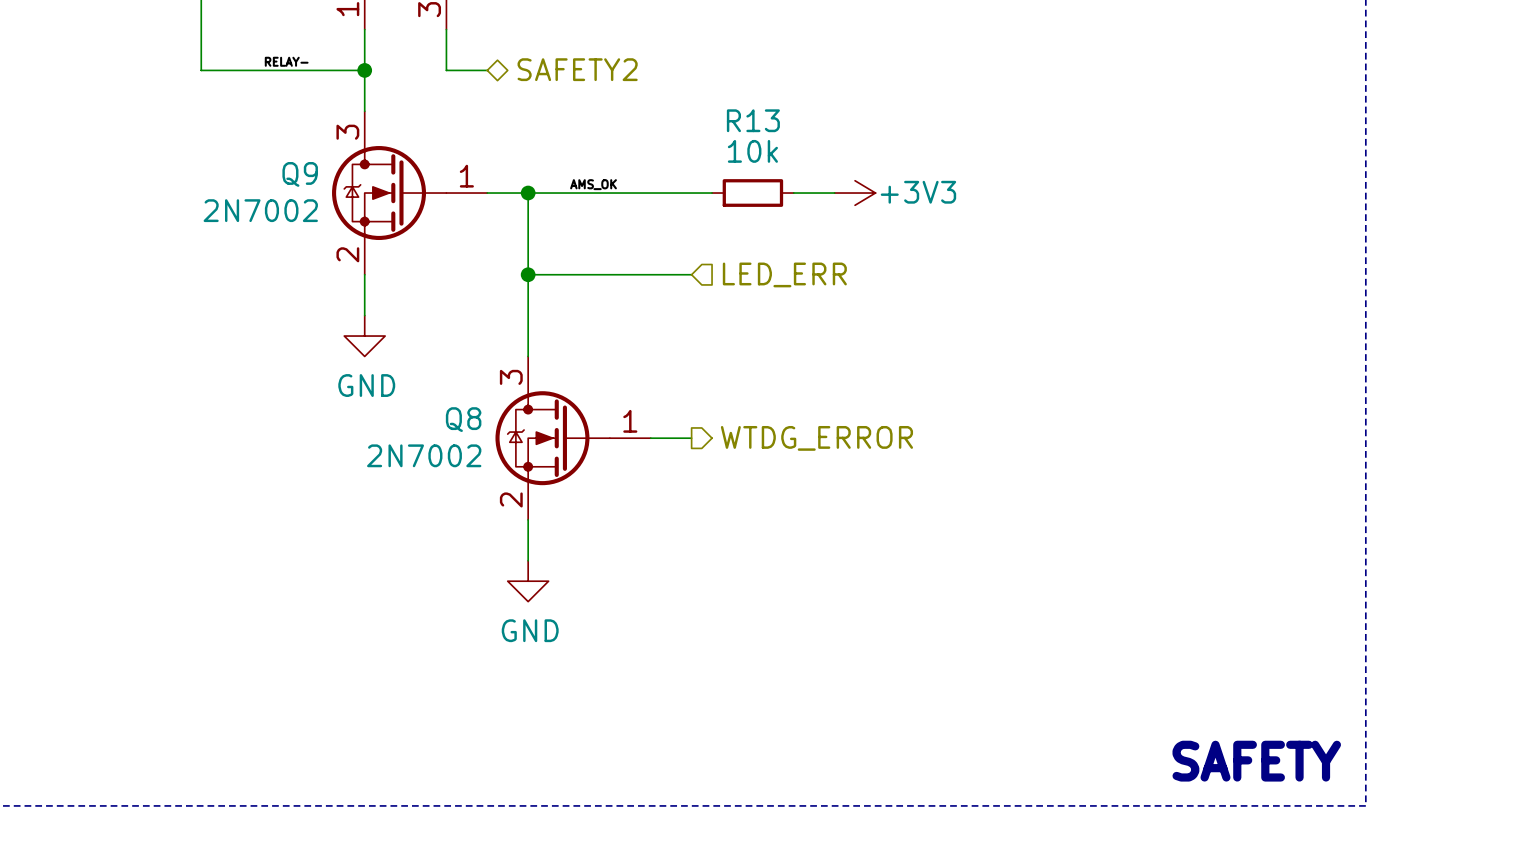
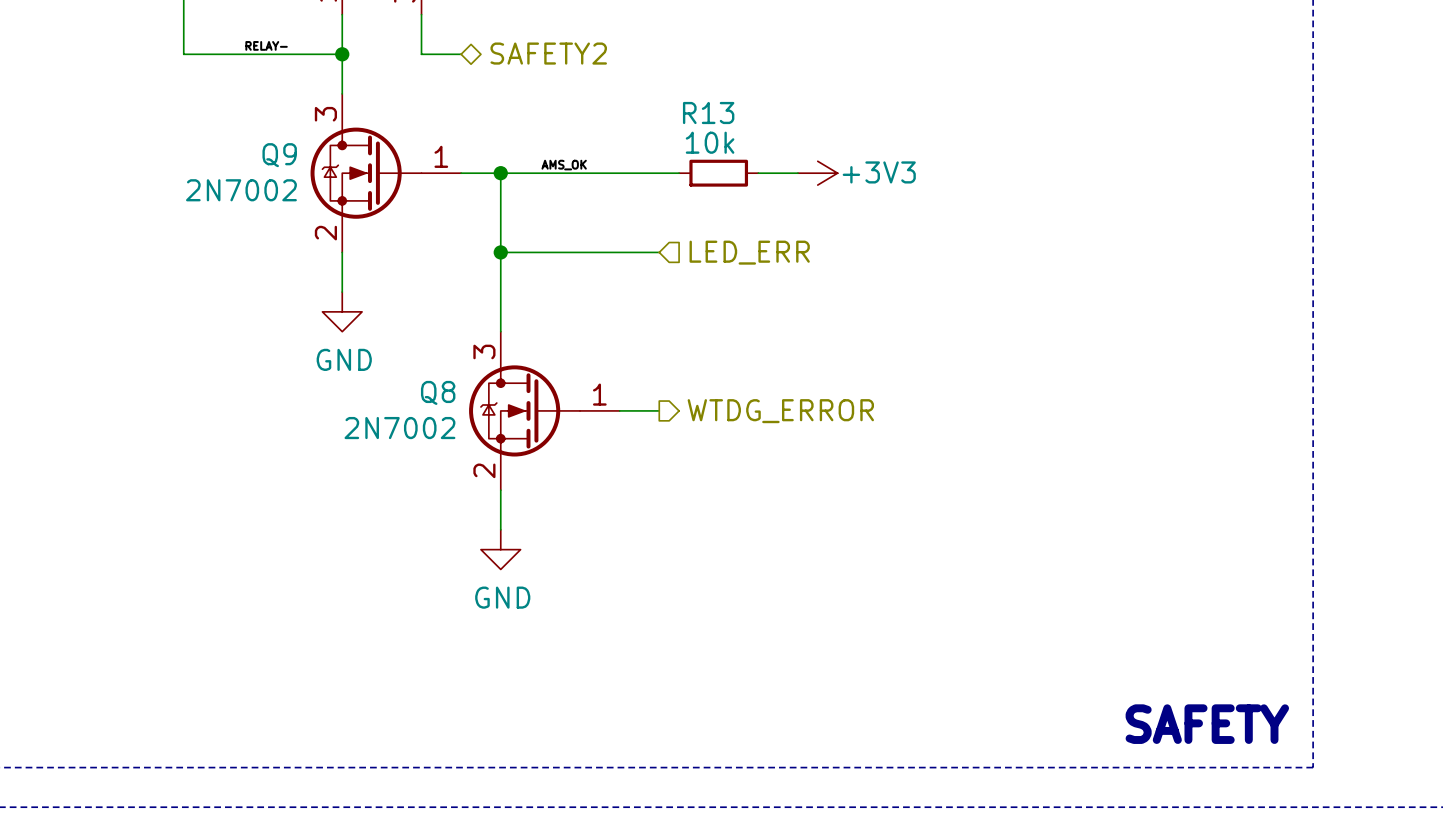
R13 name position: R13 (753, 120) -> R13 (708, 113)
R13 value position: 10k (752, 151) -> 10k (710, 142)

